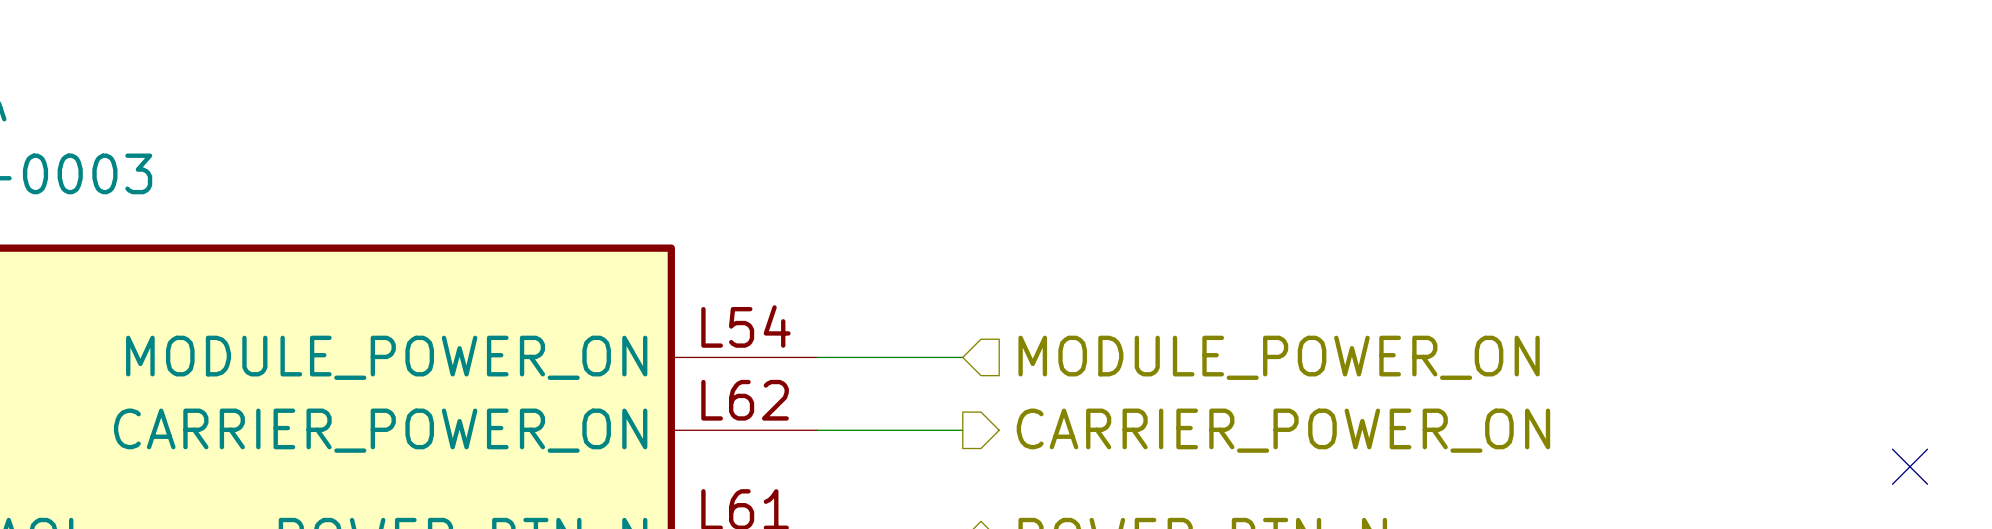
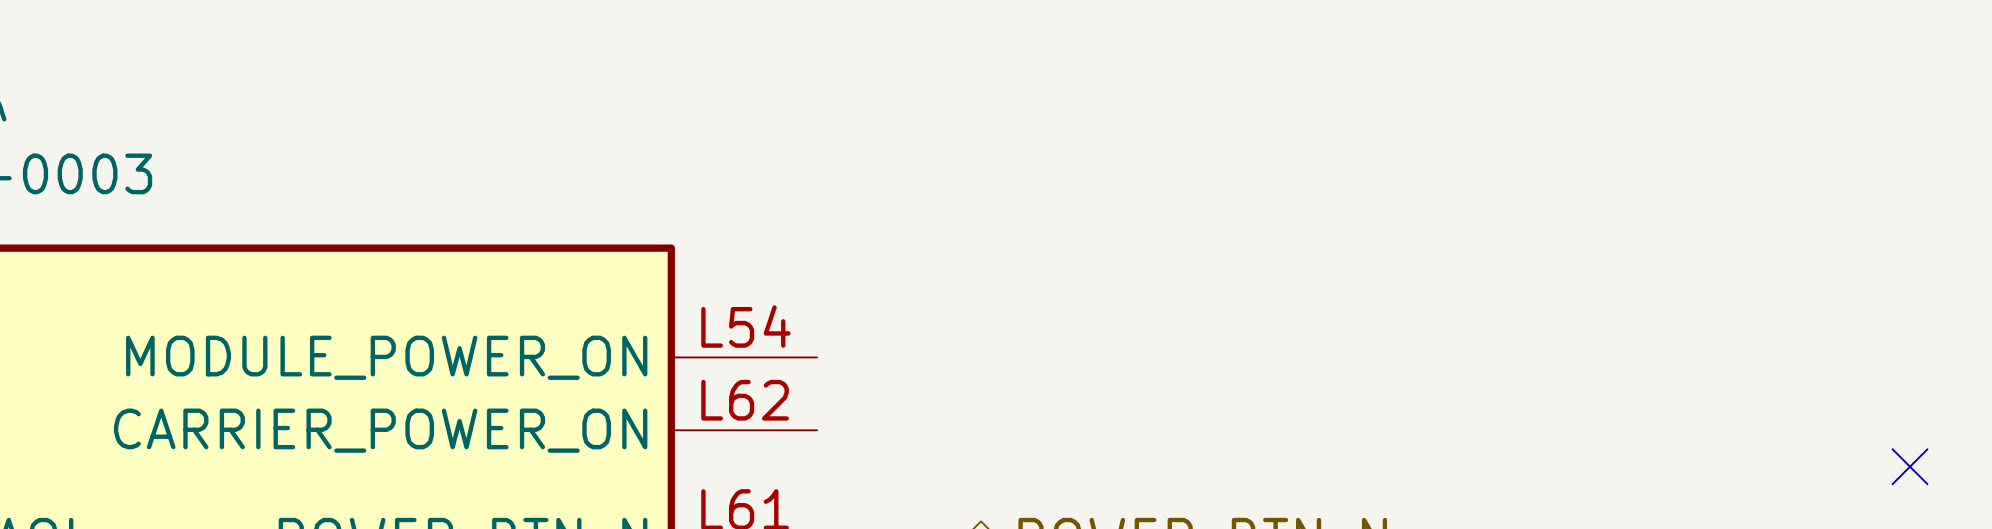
wire: (817, 357) (962, 357) -> none
hierarchical label: MODULE_POWER_ON (1279, 357) -> none
wire: (817, 430) (962, 430) -> none
hierarchical label: CARRIER_POWER_ON (1283, 430) -> none

